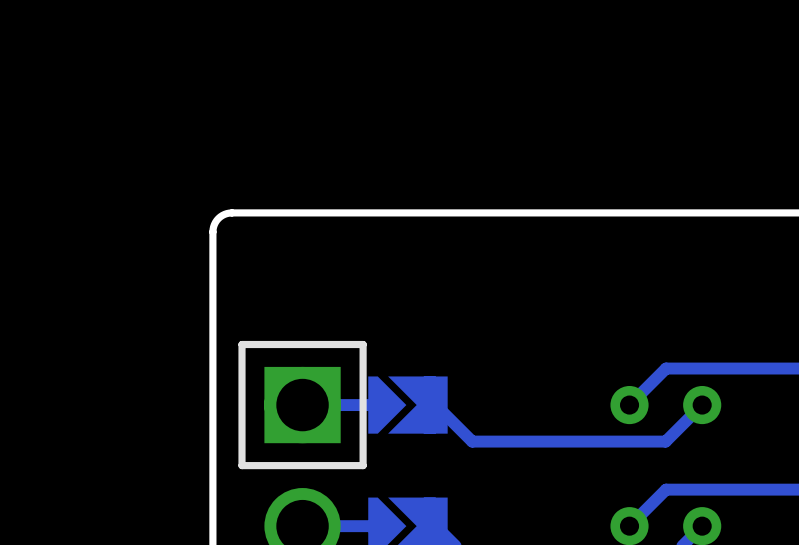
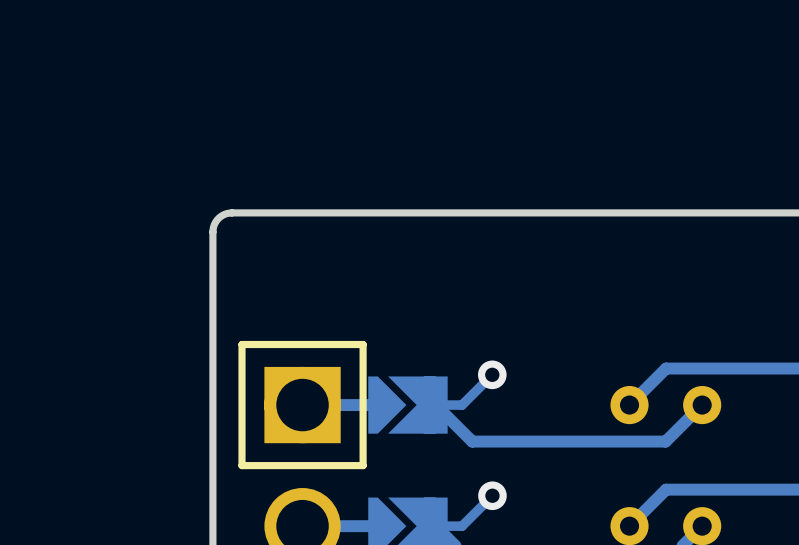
track: none -> (492, 374) (462, 405) (435, 405)
via: none -> (492, 374)
track: none -> (492, 495) (462, 526) (435, 526)
via: none -> (492, 495)

